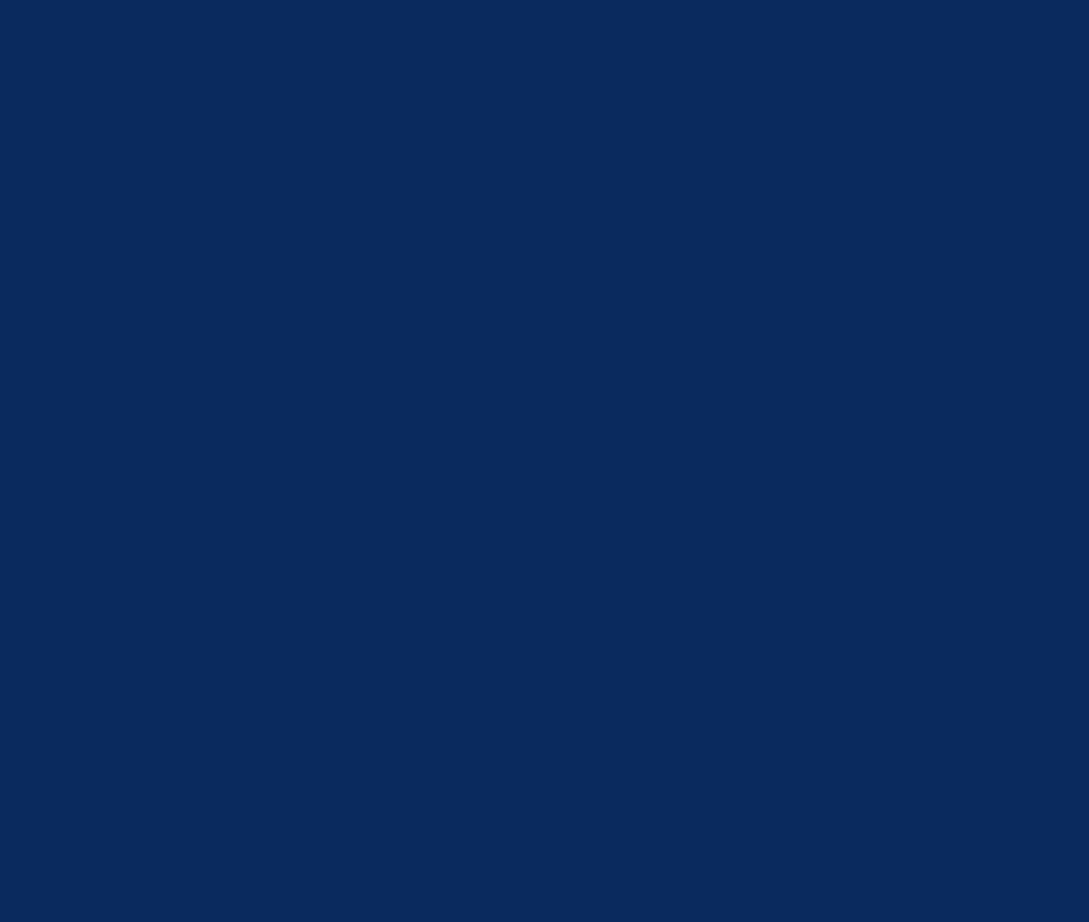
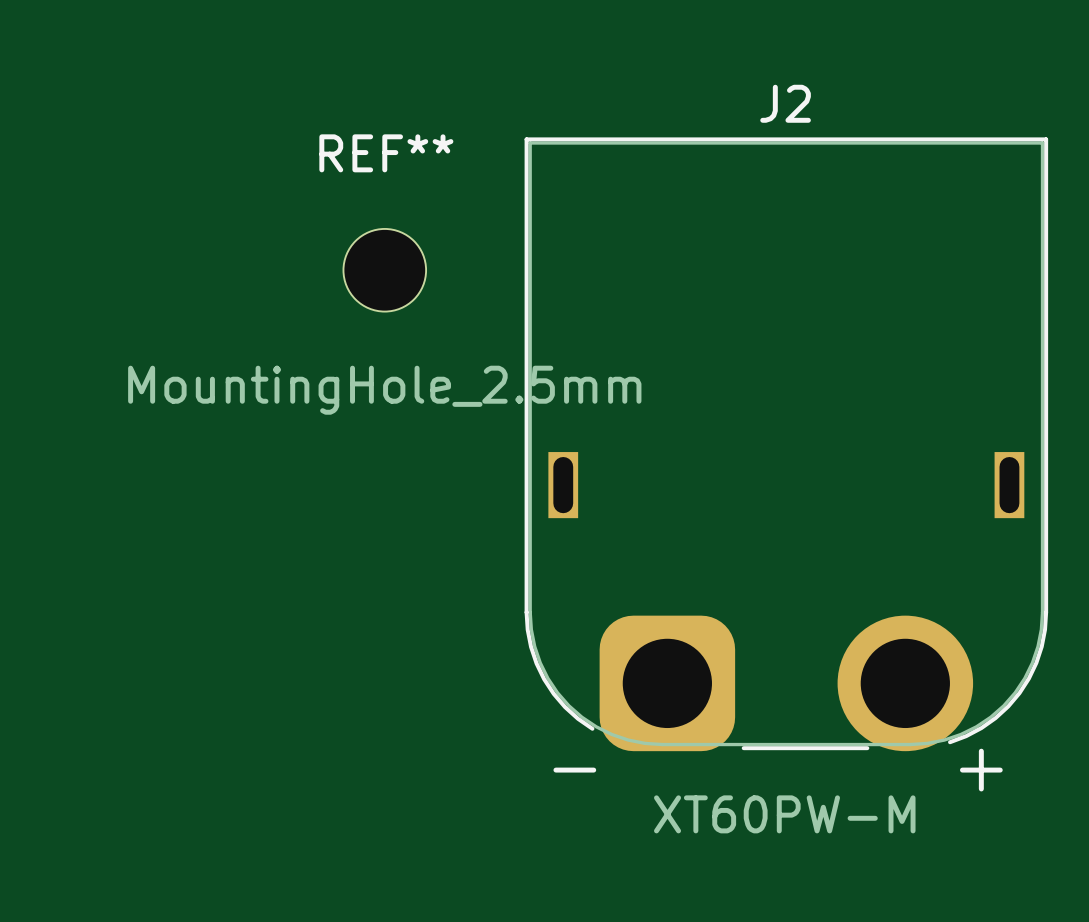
REF**: none -> MountingHole_2.5mm (384, 270)
J2: none -> XT60PW-M (786, 444)

